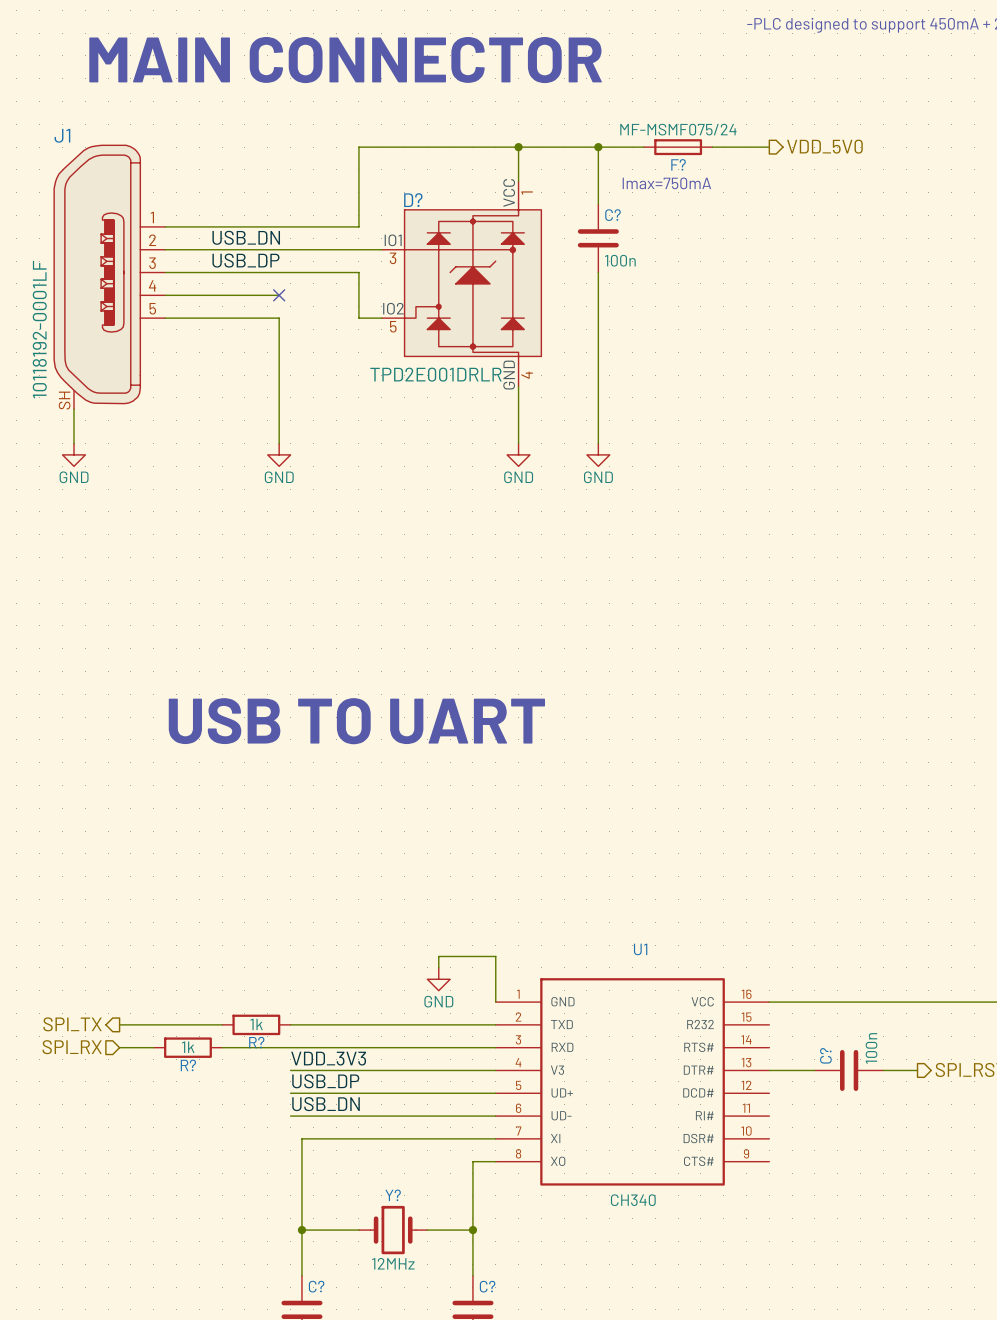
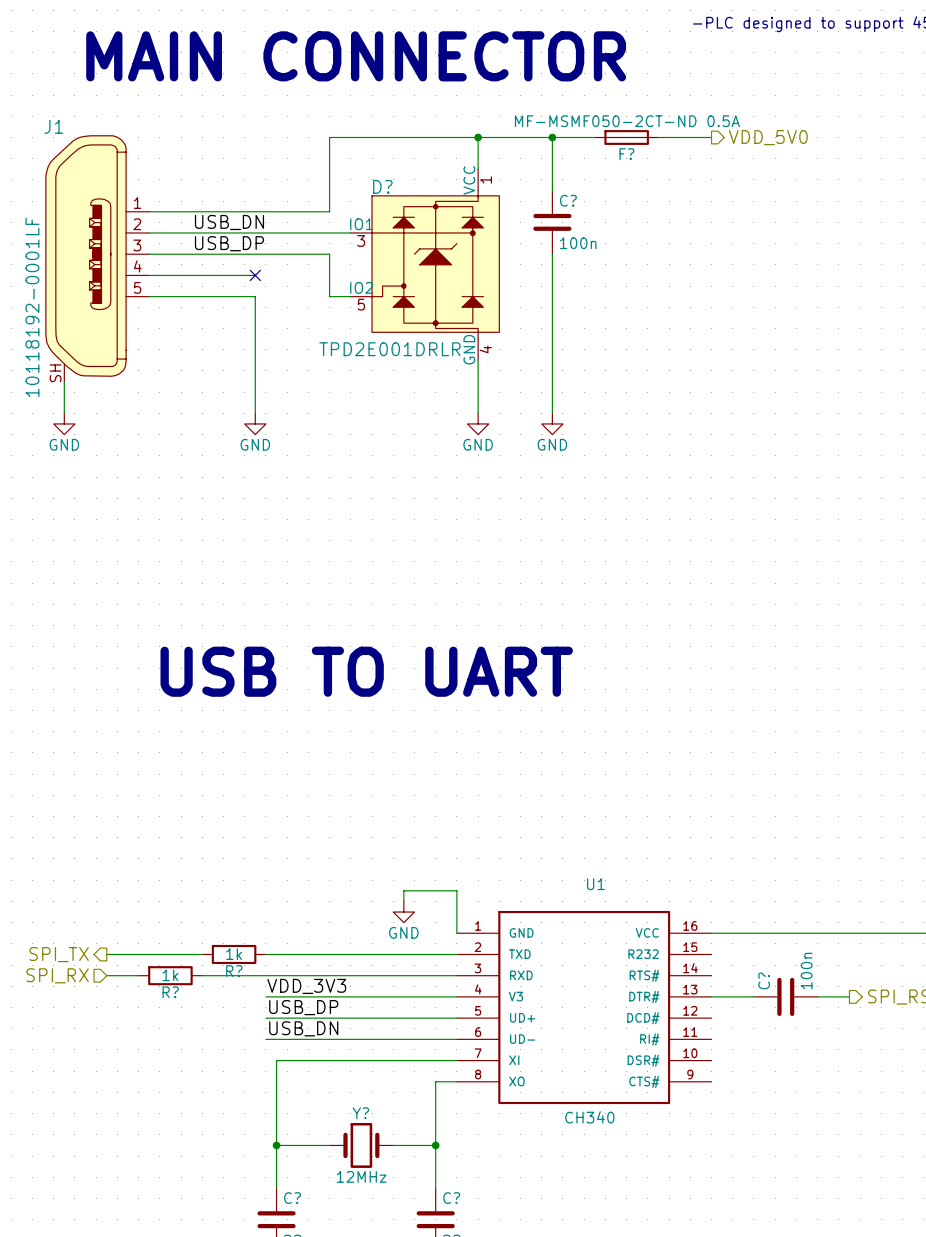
F? value: MF-MSMF075/24 (678, 129) -> MF-MSMF050-2CT-ND 0.5A (627, 121)
text: Imax=750mA (666, 183) -> none

